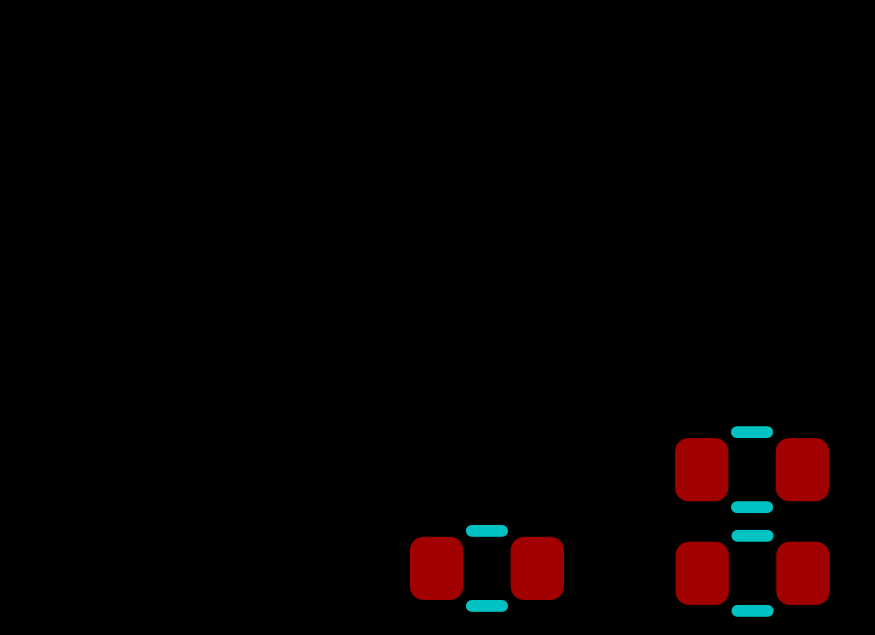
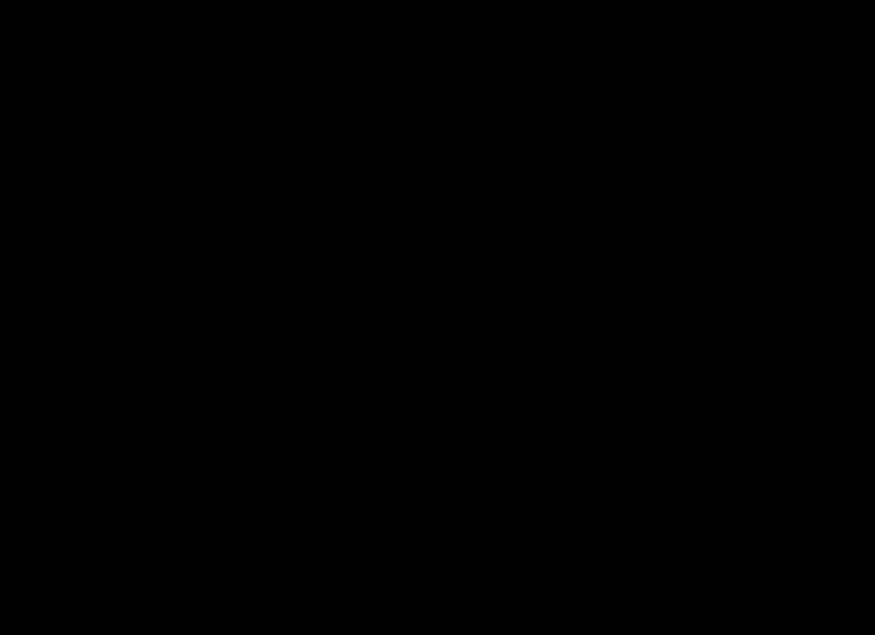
part: (752, 469) -> none
part: (486, 568) -> none
part: (752, 573) -> none

